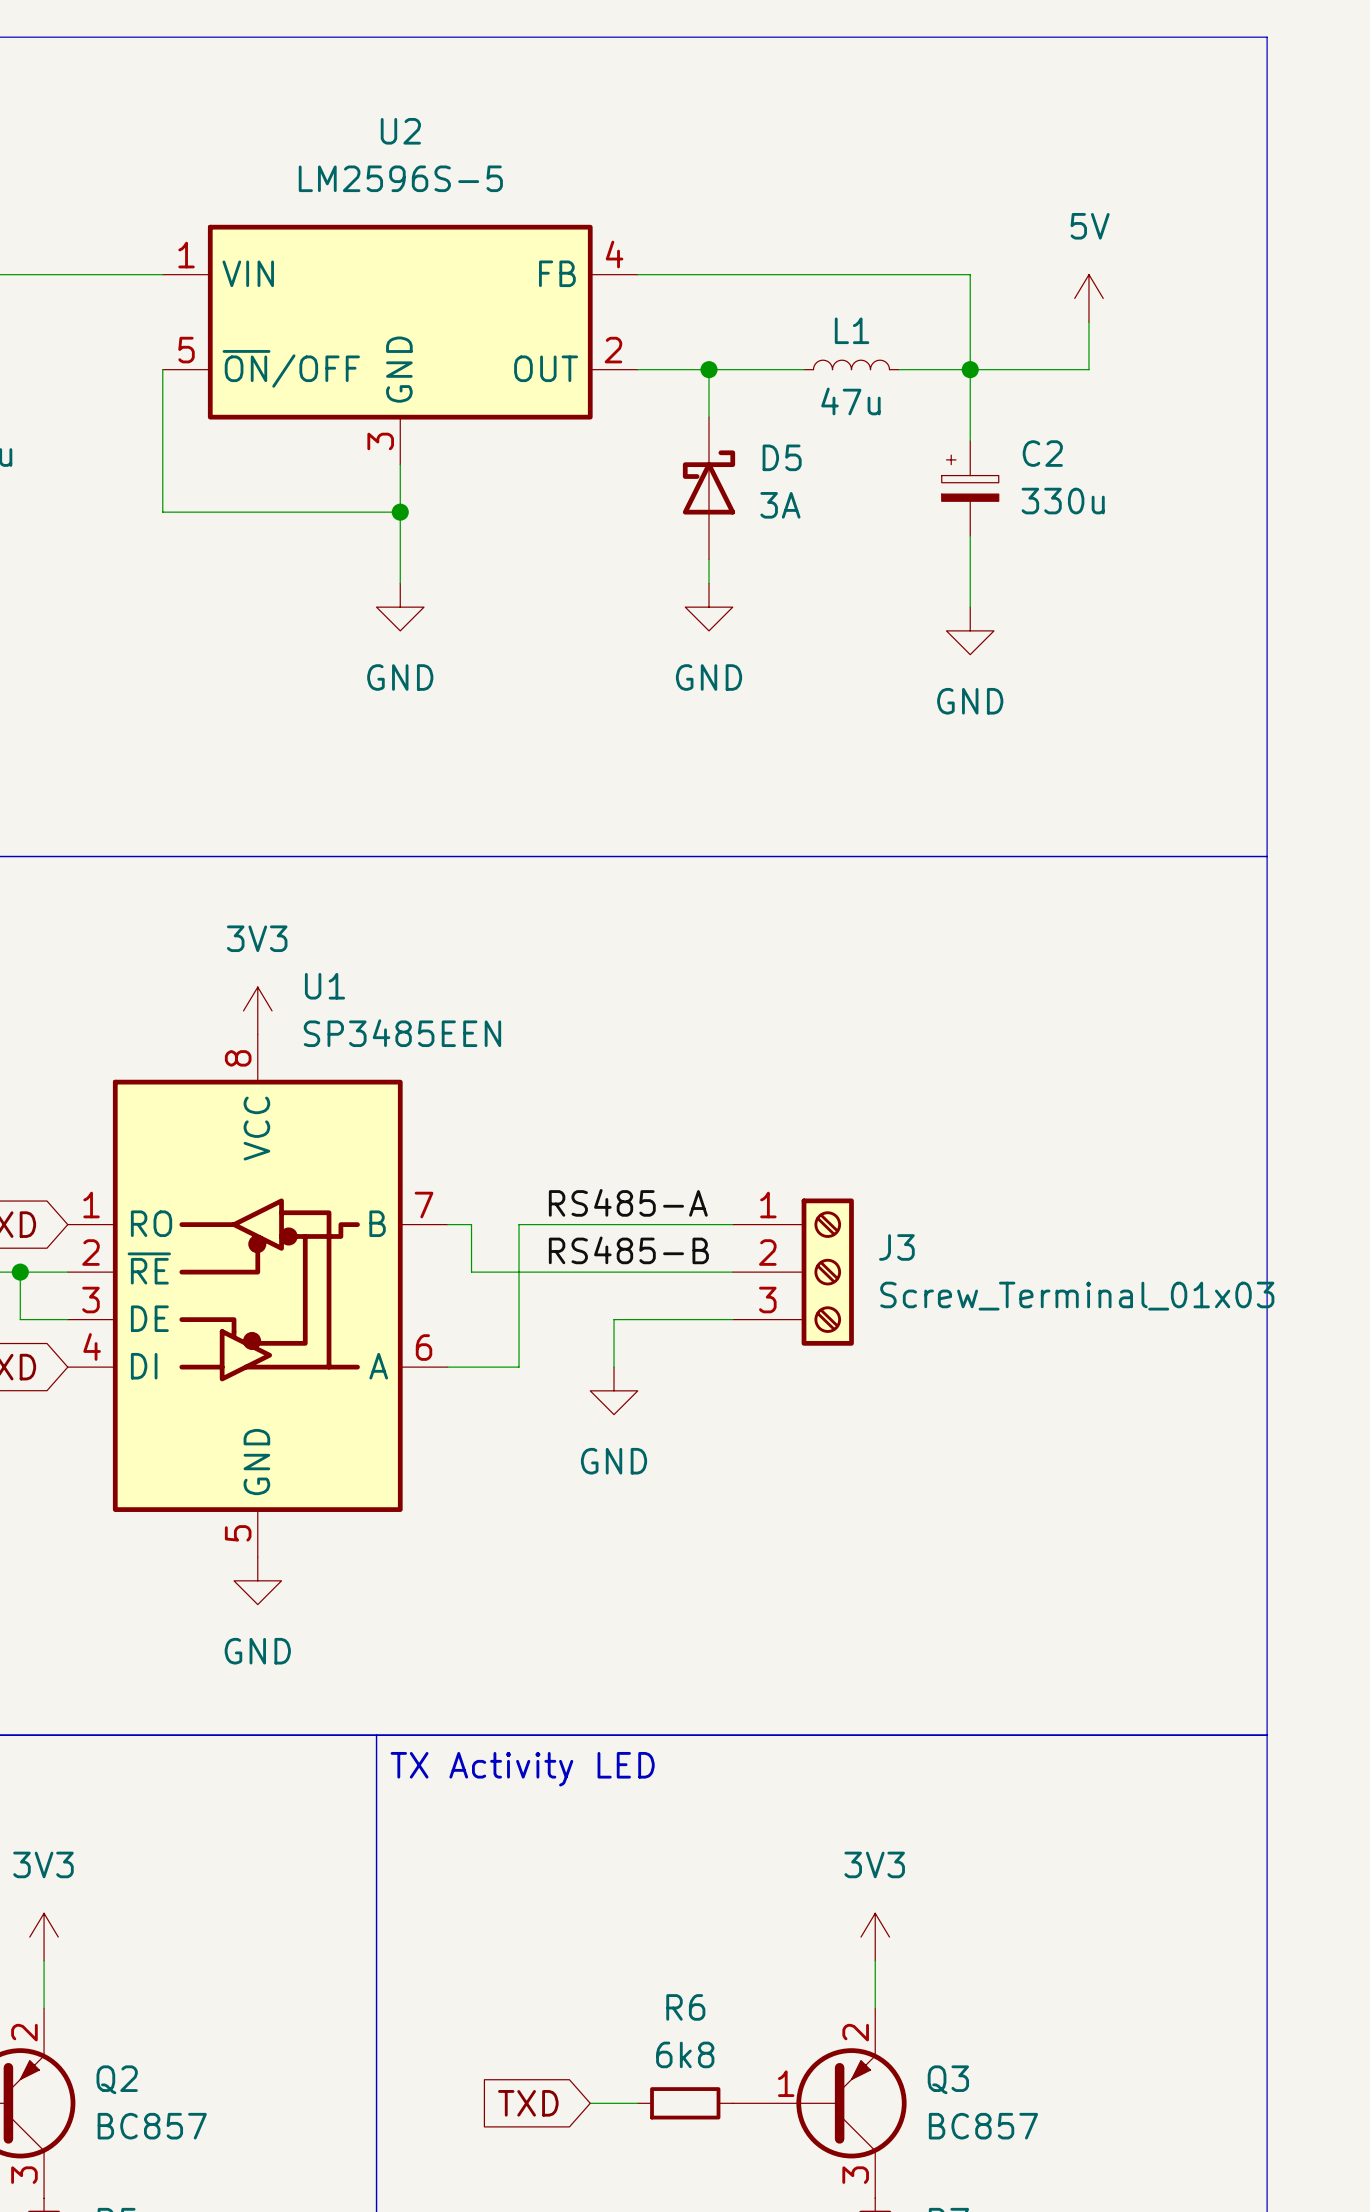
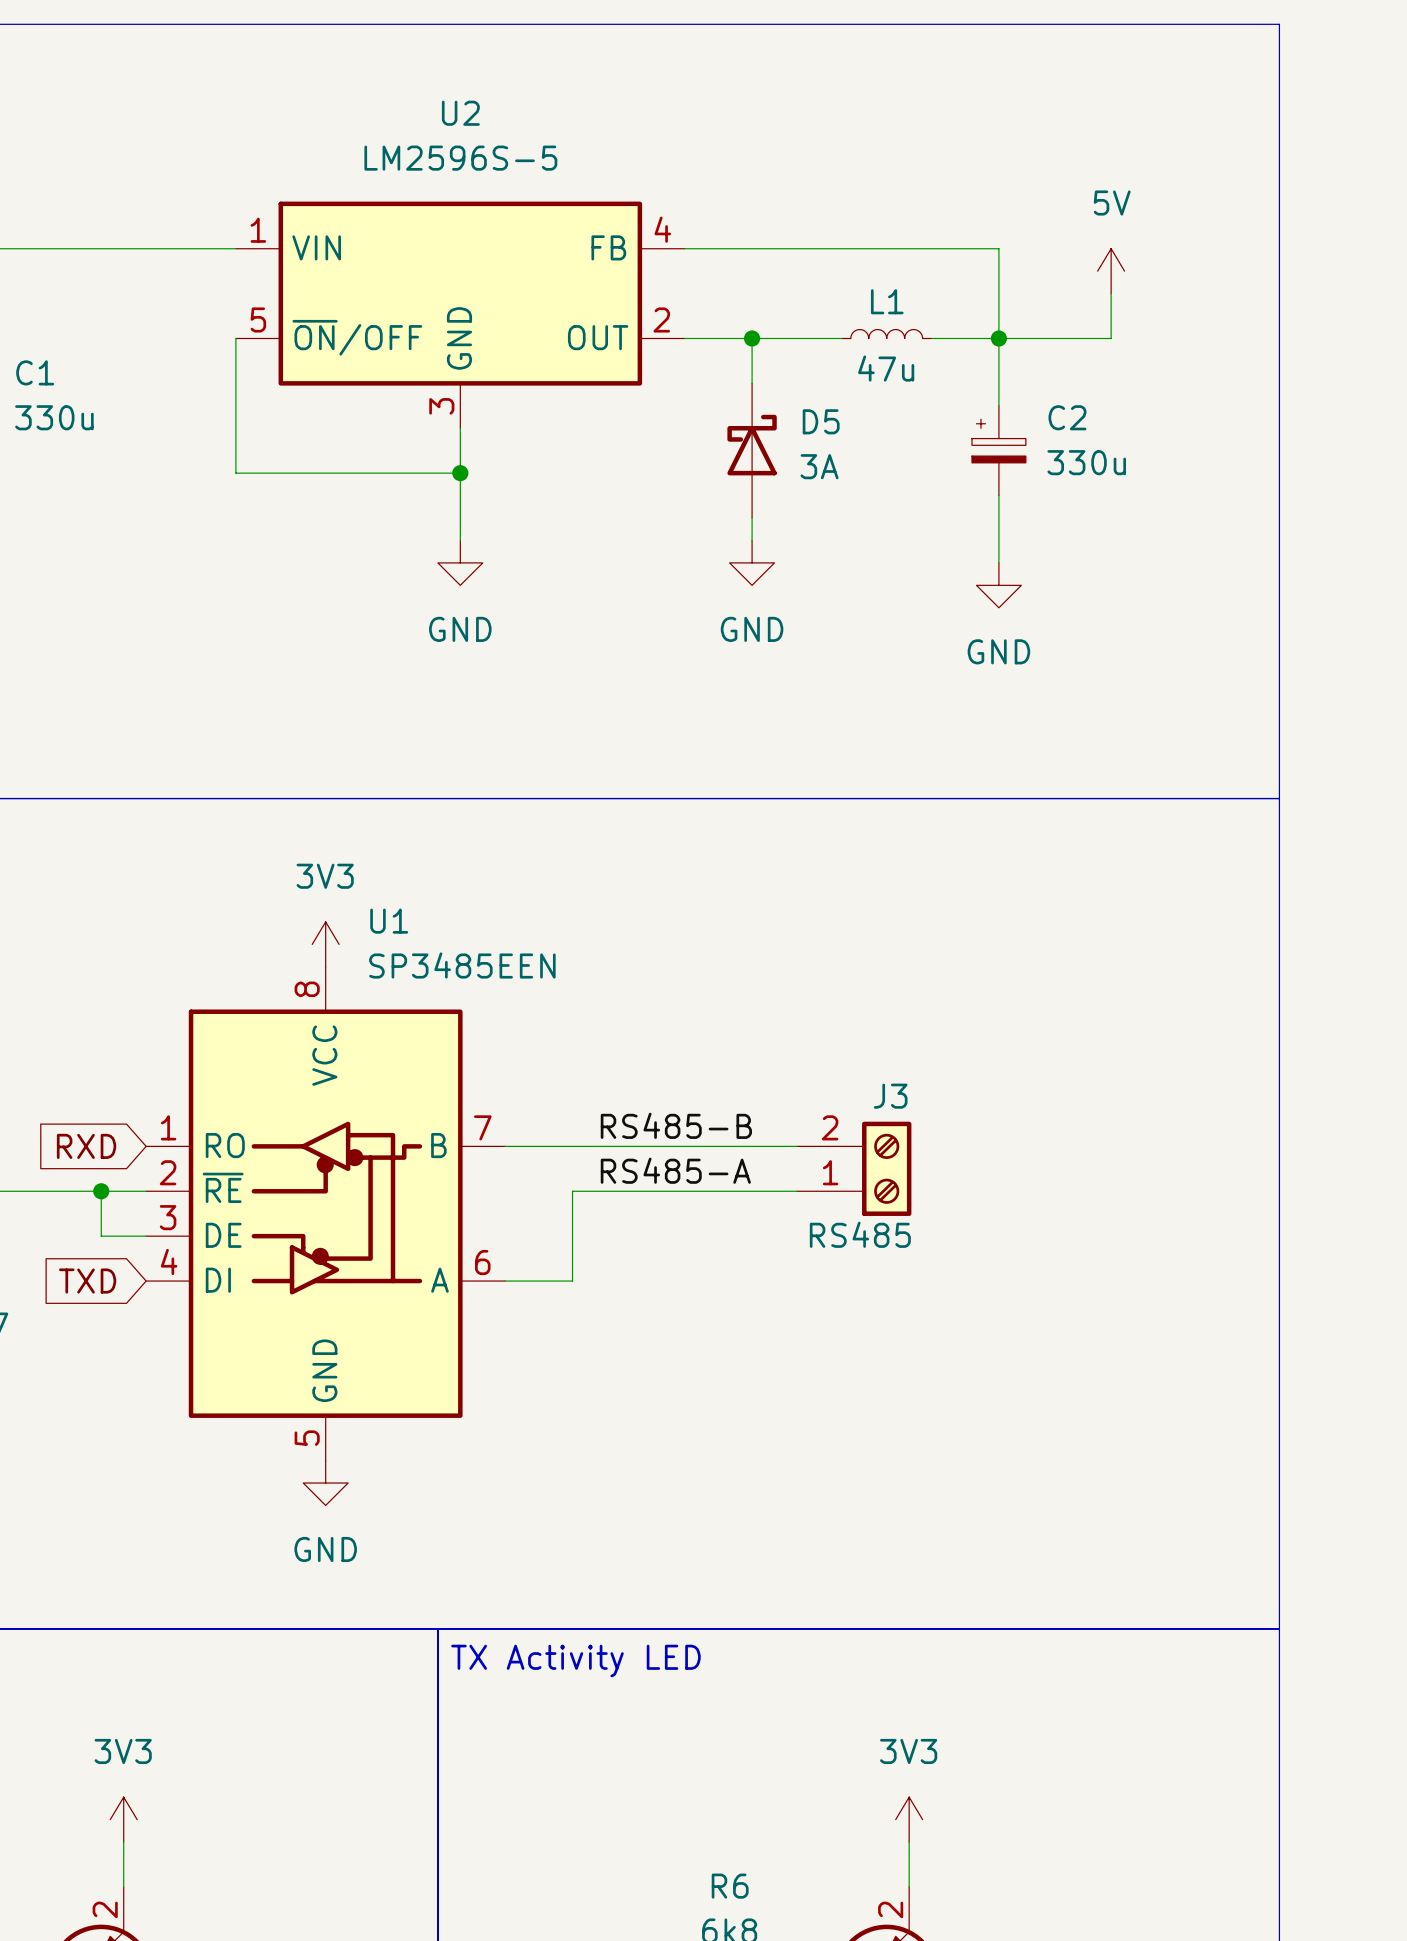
J3 symbol: [732, 1198, 854, 1346] -> [796, 1121, 912, 1216]
label: RS485-A (628, 1202) -> RS485-B (676, 1125)
wire: (471, 1224) (471, 1272) (519, 1272) (519, 1224) -> (527, 1146) (572, 1146)
J3 name position: J3 (896, 1247) -> J3 (890, 1096)
label: RS485-B (628, 1250) -> RS485-A (675, 1170)
J3 value: Screw_Terminal_01x03 (1077, 1296) -> RS485 (860, 1234)
wire: (732, 1319) (614, 1319) (614, 1367) -> none
power symbol: GND (614, 1390) -> none

